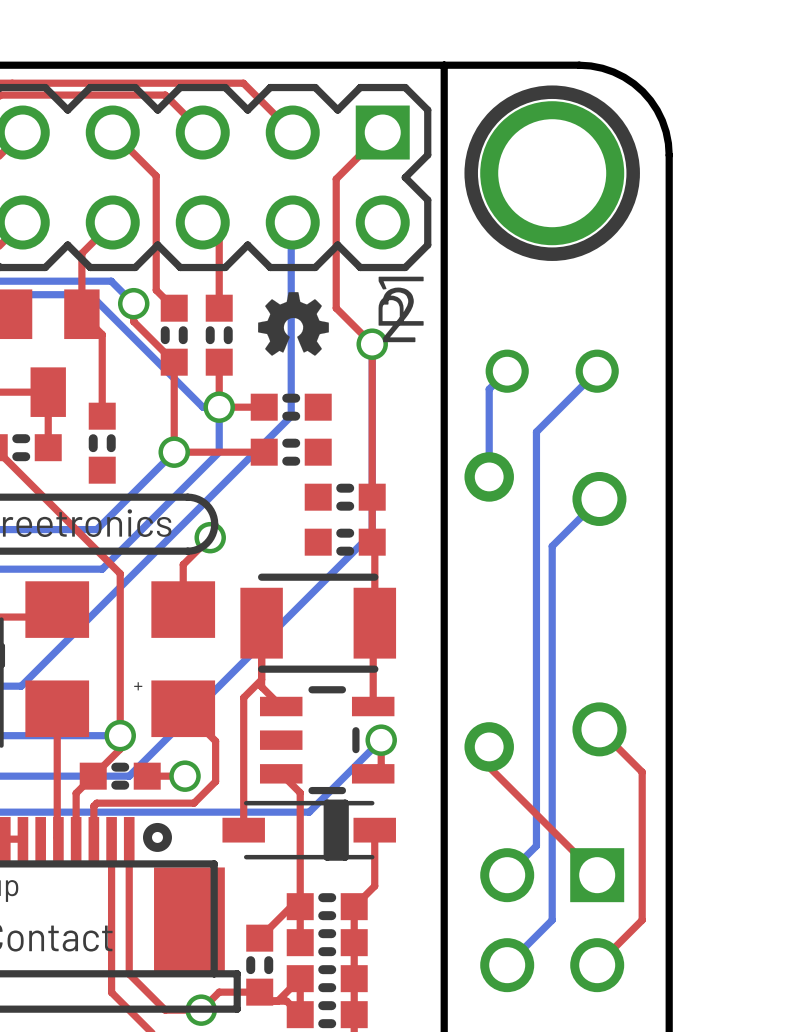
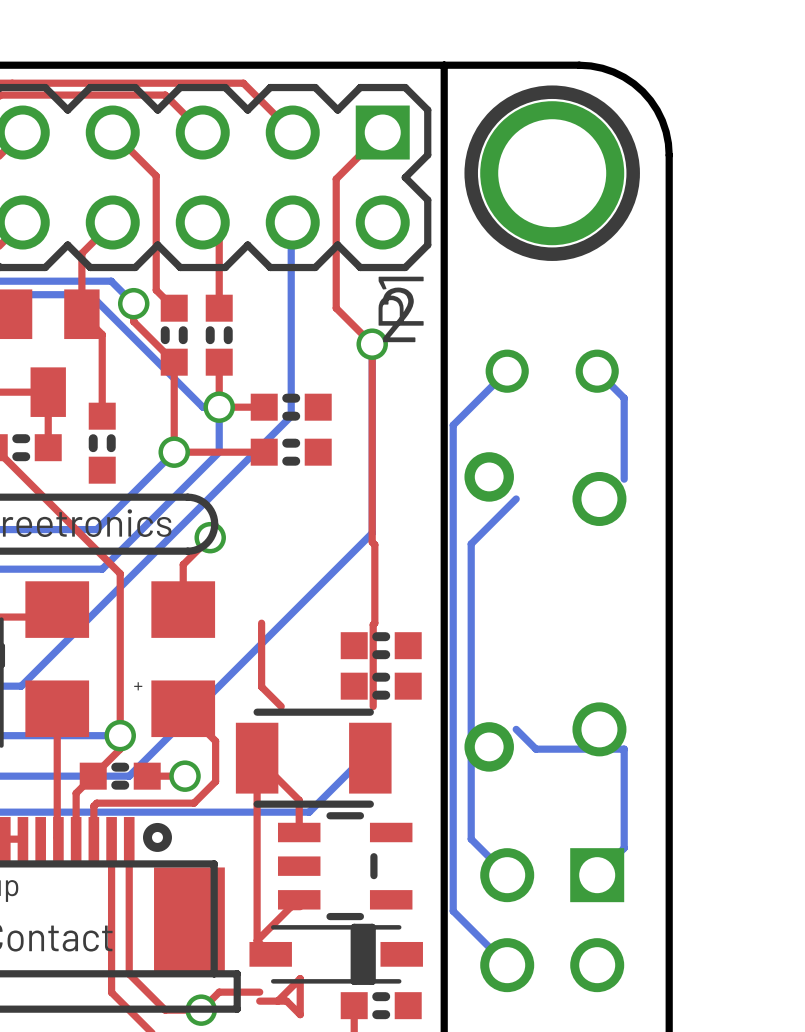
drawing: [258, 292, 329, 356] -> none
bottom track: (597, 371) (536, 431) (536, 845) (507, 875) -> (516, 498) (471, 543) (471, 839) (507, 875)
bottom track: none -> (597, 371) (624, 398) (624, 479)
bottom track: (489, 389) (489, 476) -> none
part: (345, 497) -> none
bottom track: (599, 498) (552, 546) (552, 920) (507, 965) -> (489, 389) (453, 425) (453, 911) (507, 965)
part: (345, 542) -> none
part: (318, 623) -> none
part: none -> (381, 645)
top track: (261, 679) (243, 697) (243, 830) -> none
part footprint: [259, 686, 395, 795] -> [235, 708, 392, 808]
part: none -> (381, 686)
bottom track: none -> (516, 729) (536, 749) (624, 749) (624, 848) (597, 875)
top track: (599, 729) (642, 772) (642, 920) (597, 965) -> none
via: (381, 740) -> none
top track: (489, 746) (489, 767) (597, 875) -> none
top track: (281, 773) (300, 792) (300, 942) -> none
part position: (309, 830) -> (336, 954)
top track: (374, 830) (374, 886) (354, 906) (354, 1005) -> none
top track: none -> (299, 832) (299, 800) (257, 758) (257, 940) (270, 954)
part: none -> (345, 866)
part: (327, 906) -> none
part: (327, 942) -> none
part: (259, 965) -> none
part: (327, 978) -> none
part: none -> (381, 1005)
part: (327, 1014) -> none

